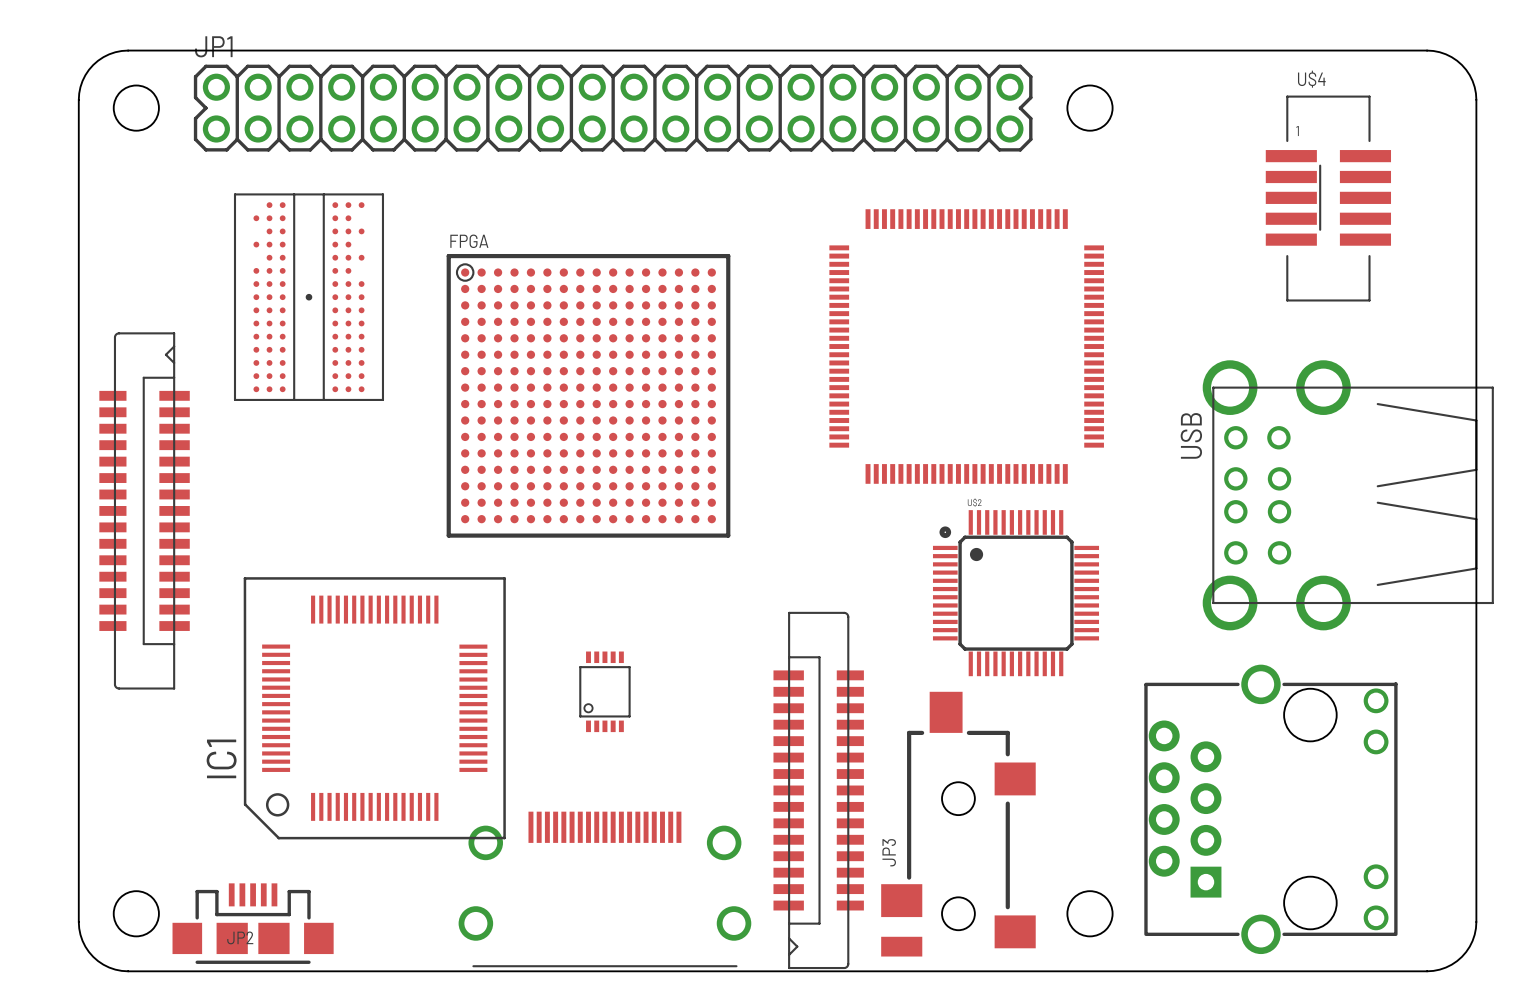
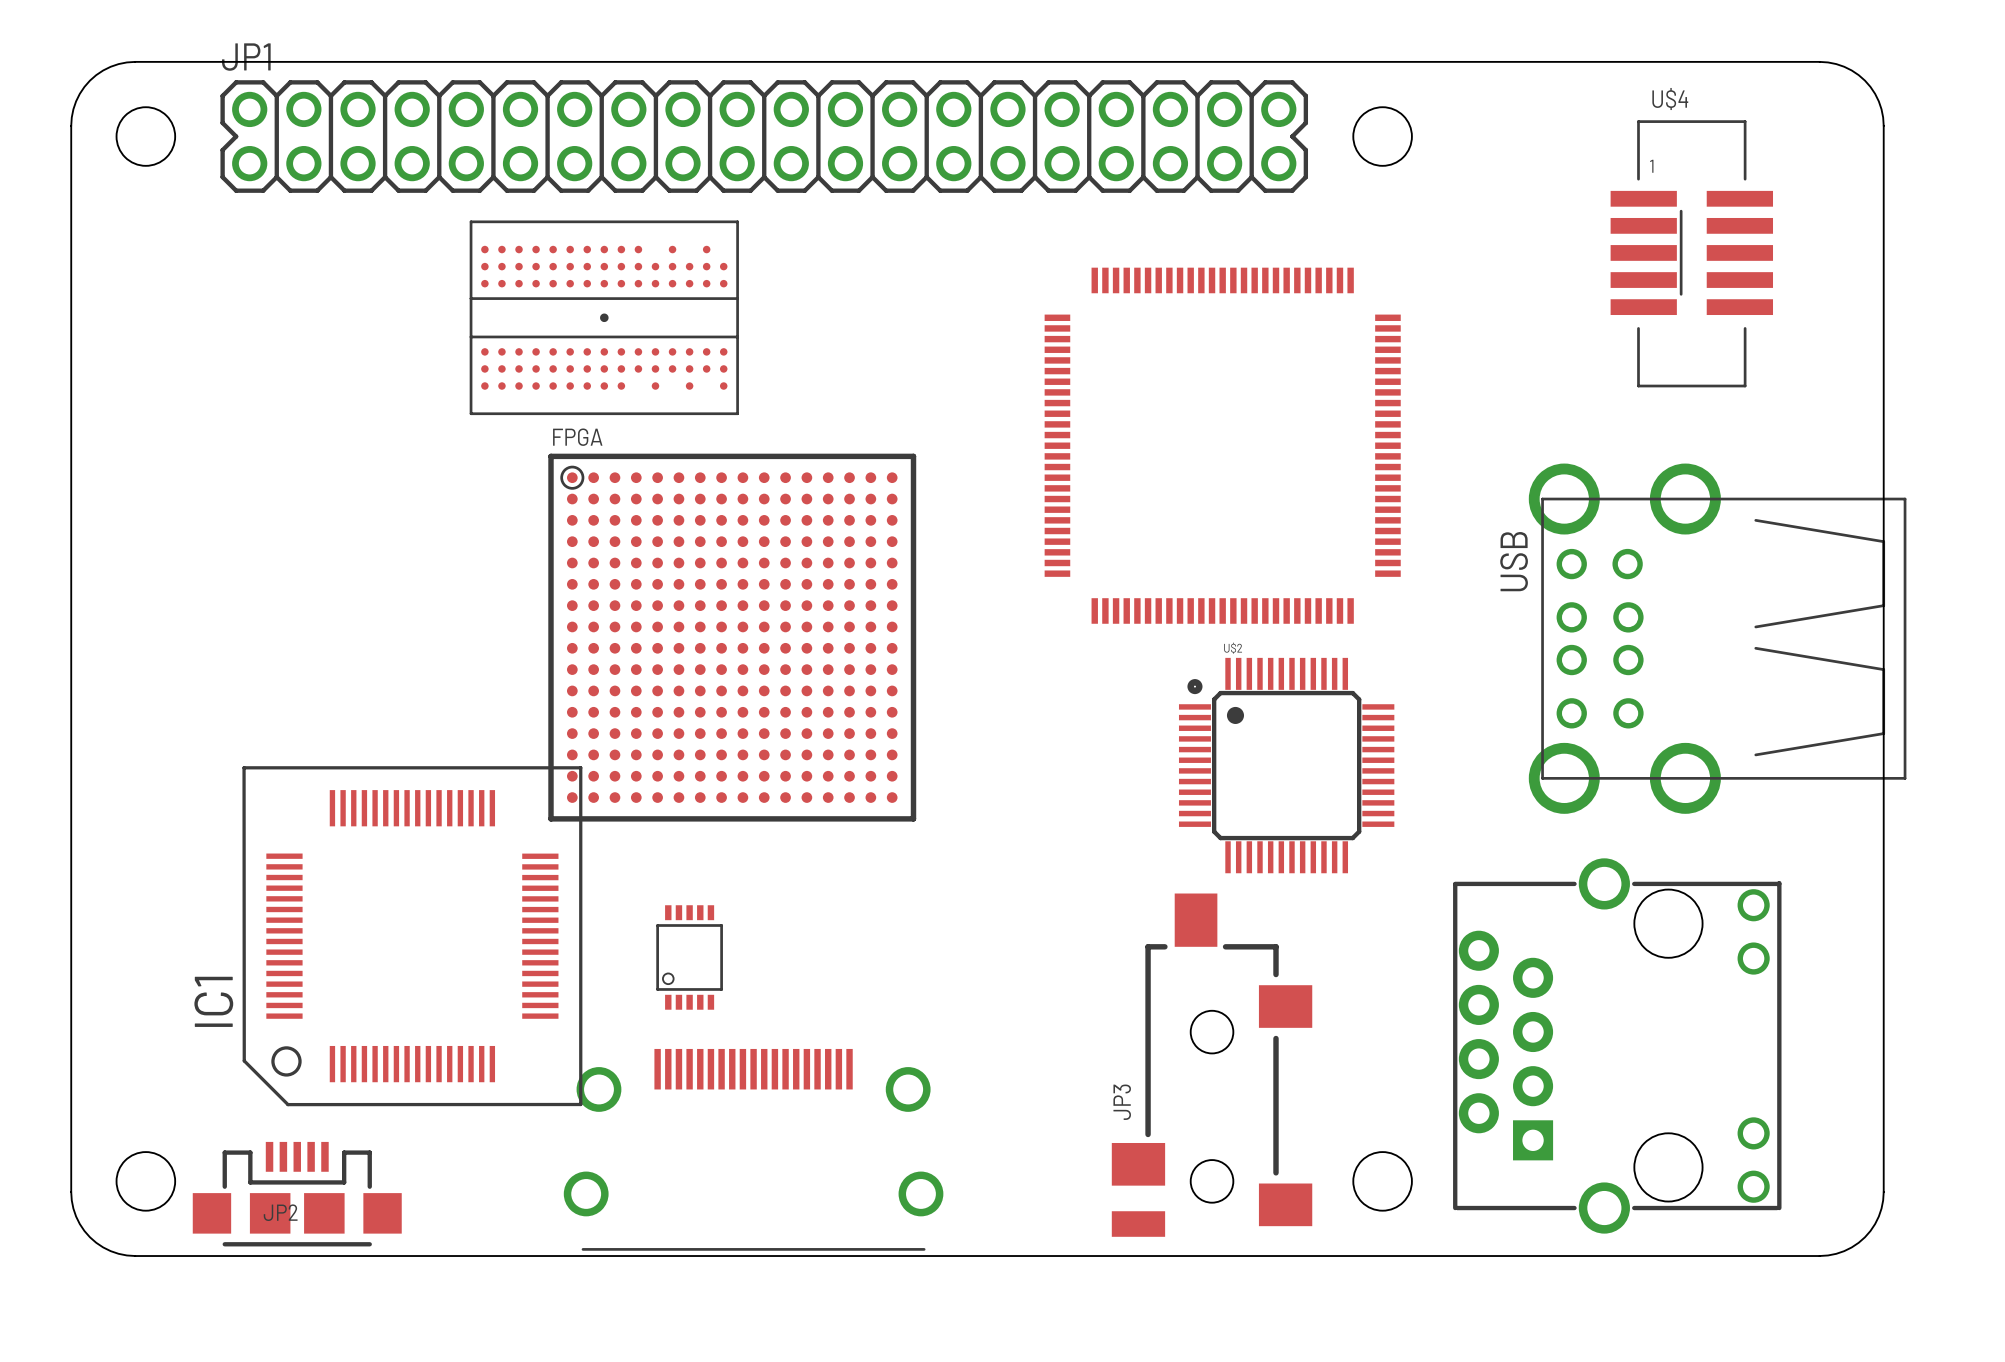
part rotation: 0° (308, 297) -> 90° clockwise (604, 317)
part position: (308, 297) -> (604, 317)
FPGA position: (588, 395) -> (732, 637)
part: (144, 510) -> none
part position: (604, 691) -> (689, 957)
IC1 position: (374, 708) -> (412, 936)
part: (818, 790) -> none

